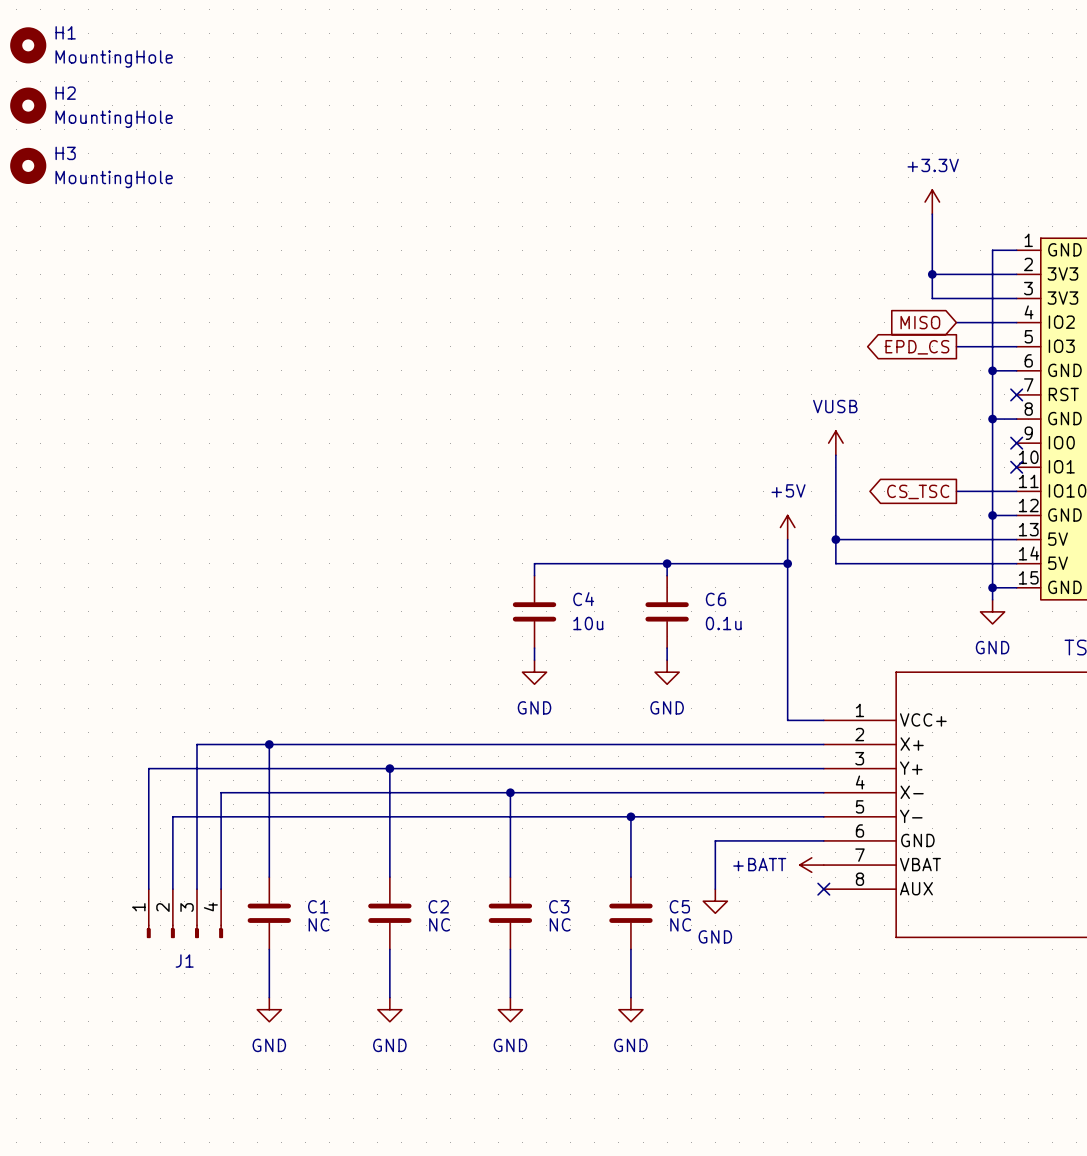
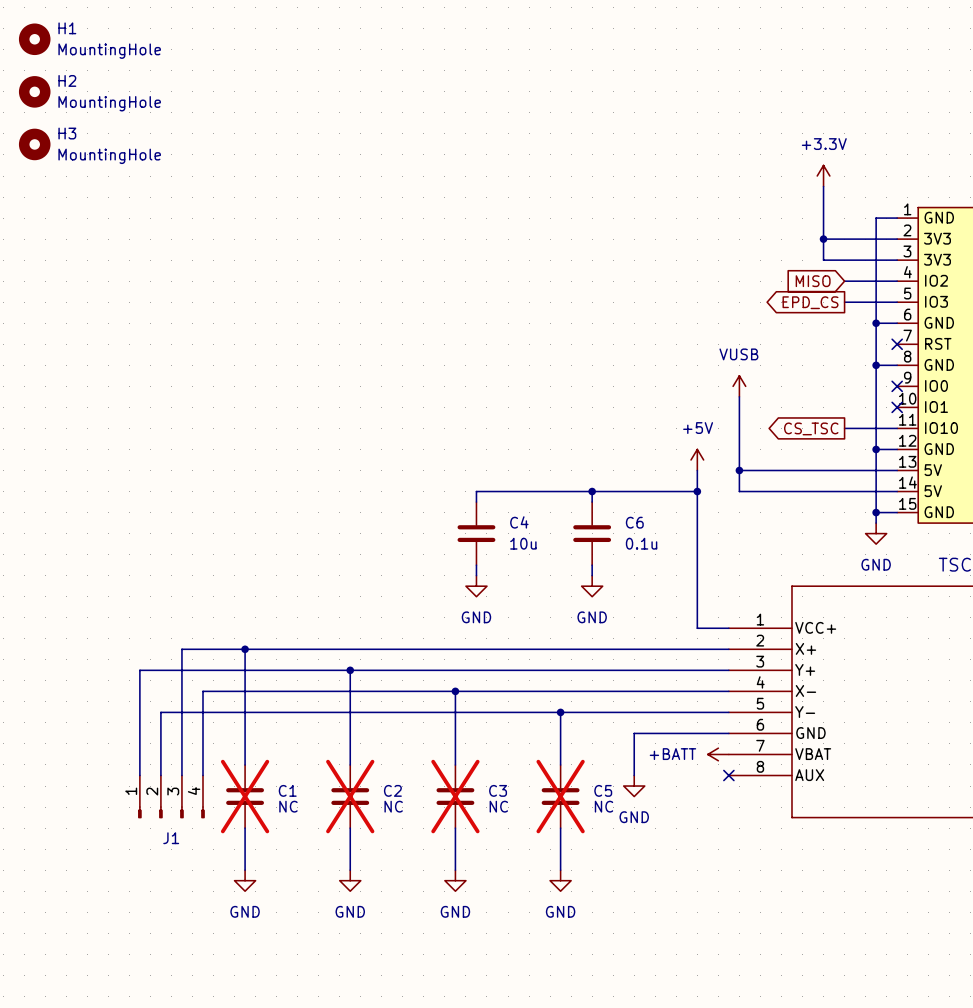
C1 do-not-place cross: none -> (245, 796)
C2 do-not-place cross: none -> (350, 796)
C3 do-not-place cross: none -> (455, 796)
C5 do-not-place cross: none -> (560, 796)

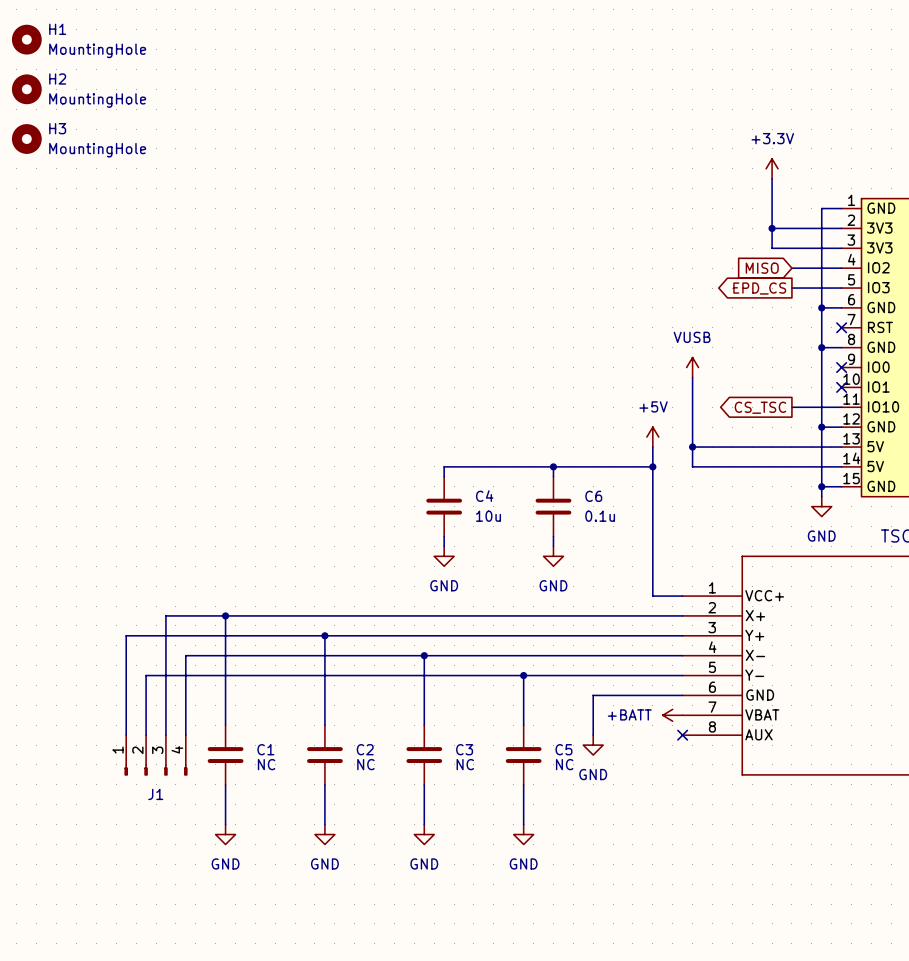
C1 do-not-place cross: (245, 796) -> none
C2 do-not-place cross: (350, 796) -> none
C3 do-not-place cross: (455, 796) -> none
C5 do-not-place cross: (560, 796) -> none

